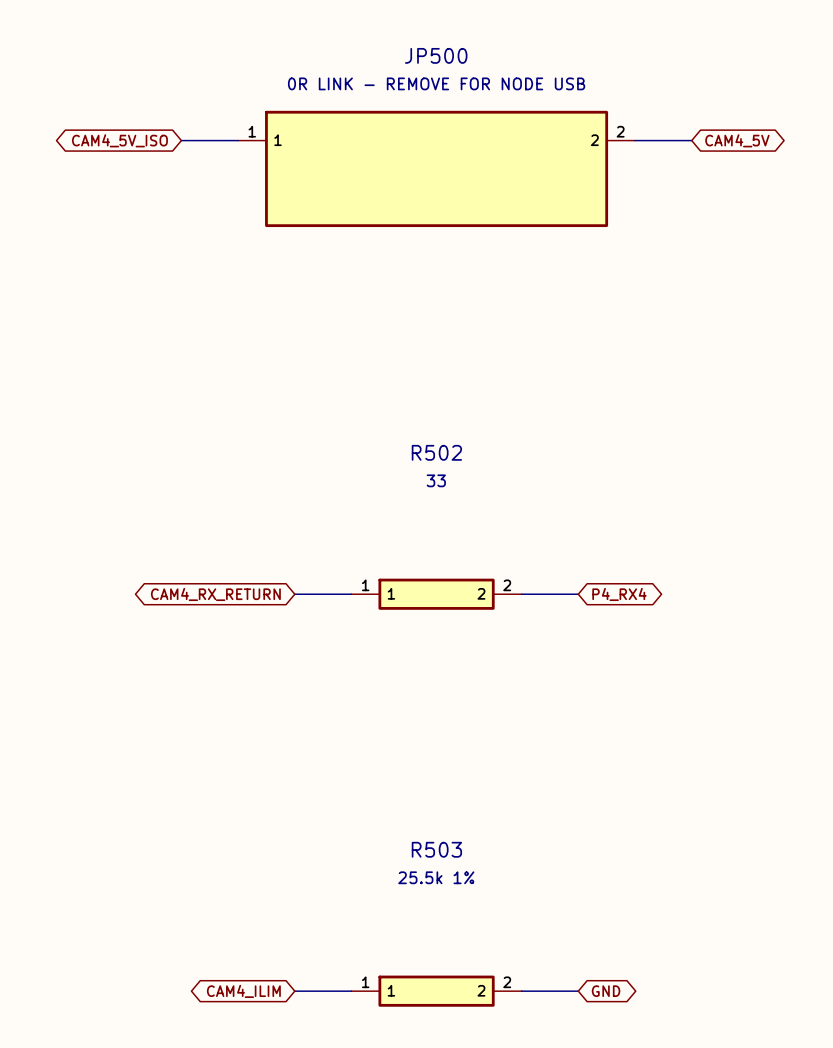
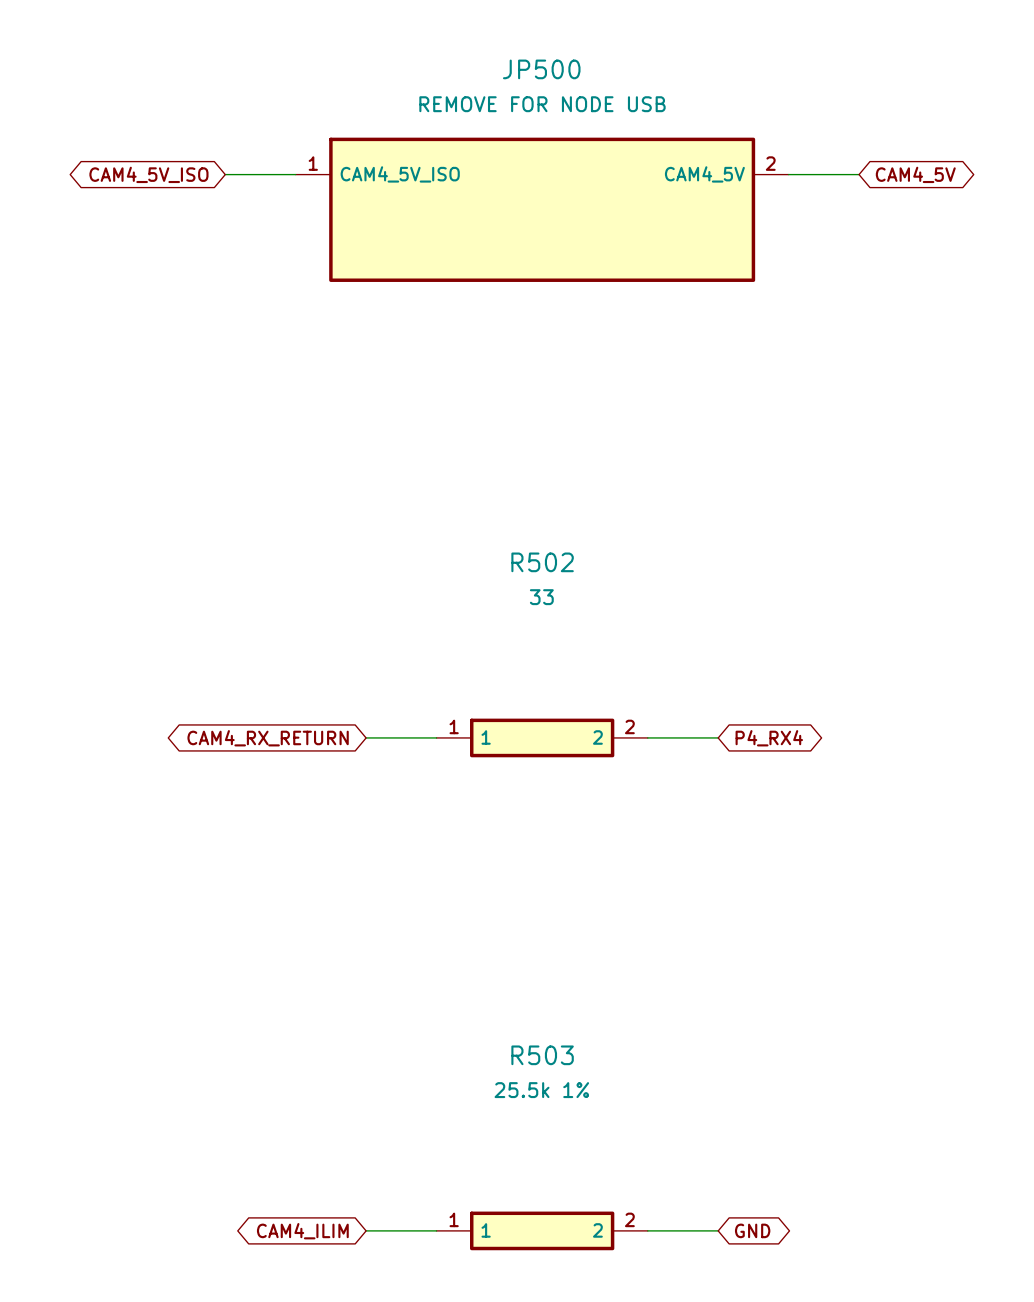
JP500 value: 0R LINK - REMOVE FOR NODE USB (436, 83) -> REMOVE FOR NODE USB (542, 104)
JP500 pin name: 1 (278, 140) -> CAM4_5V_ISO (400, 174)
JP500 pin name: 2 (594, 140) -> CAM4_5V (704, 174)

